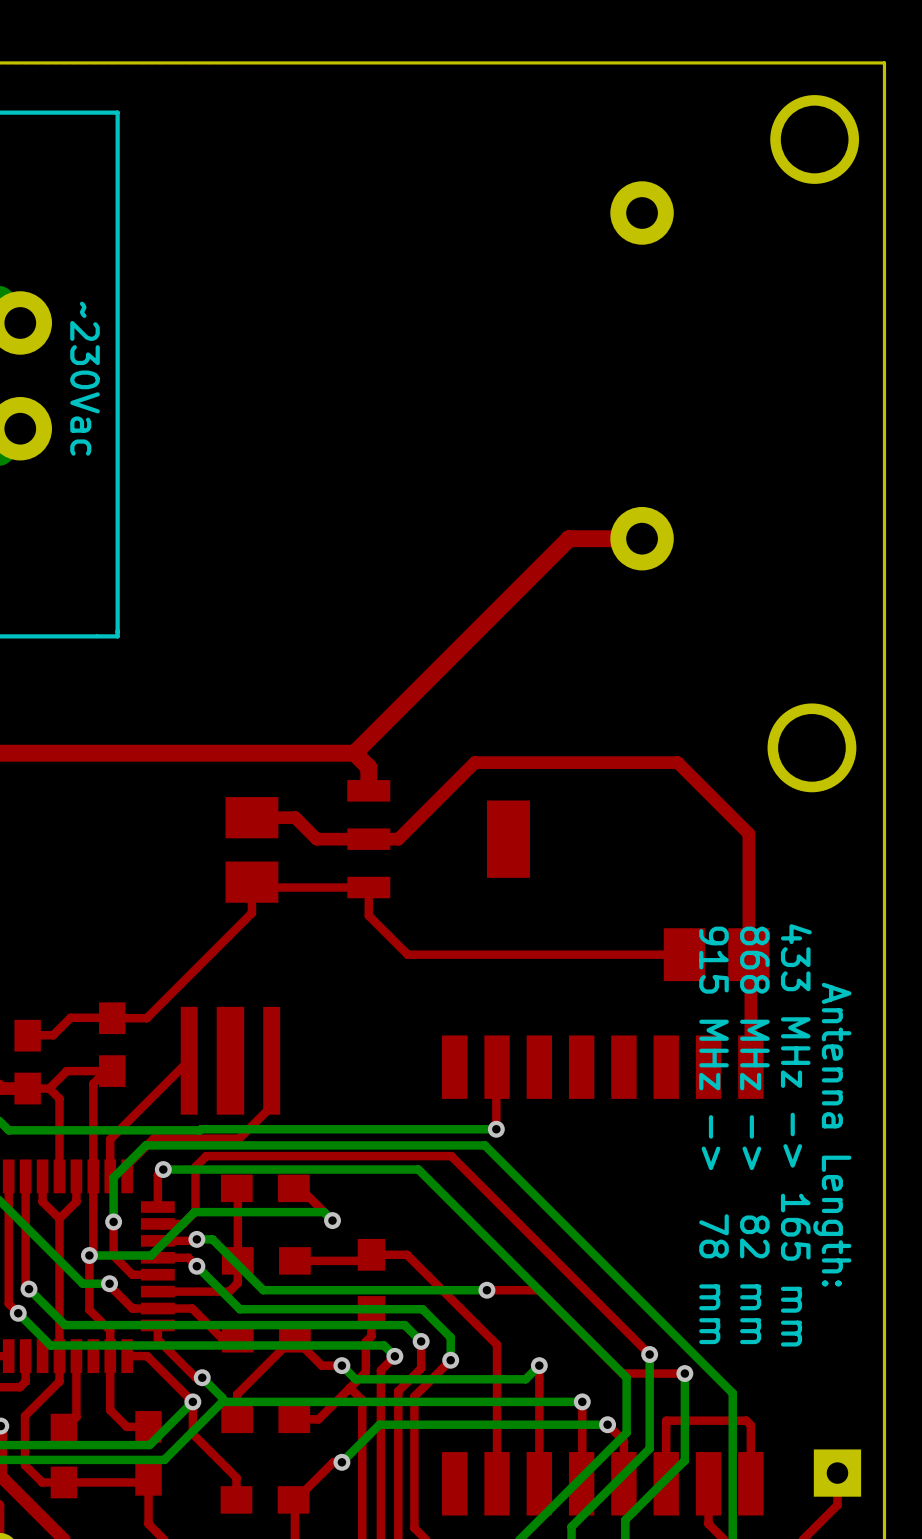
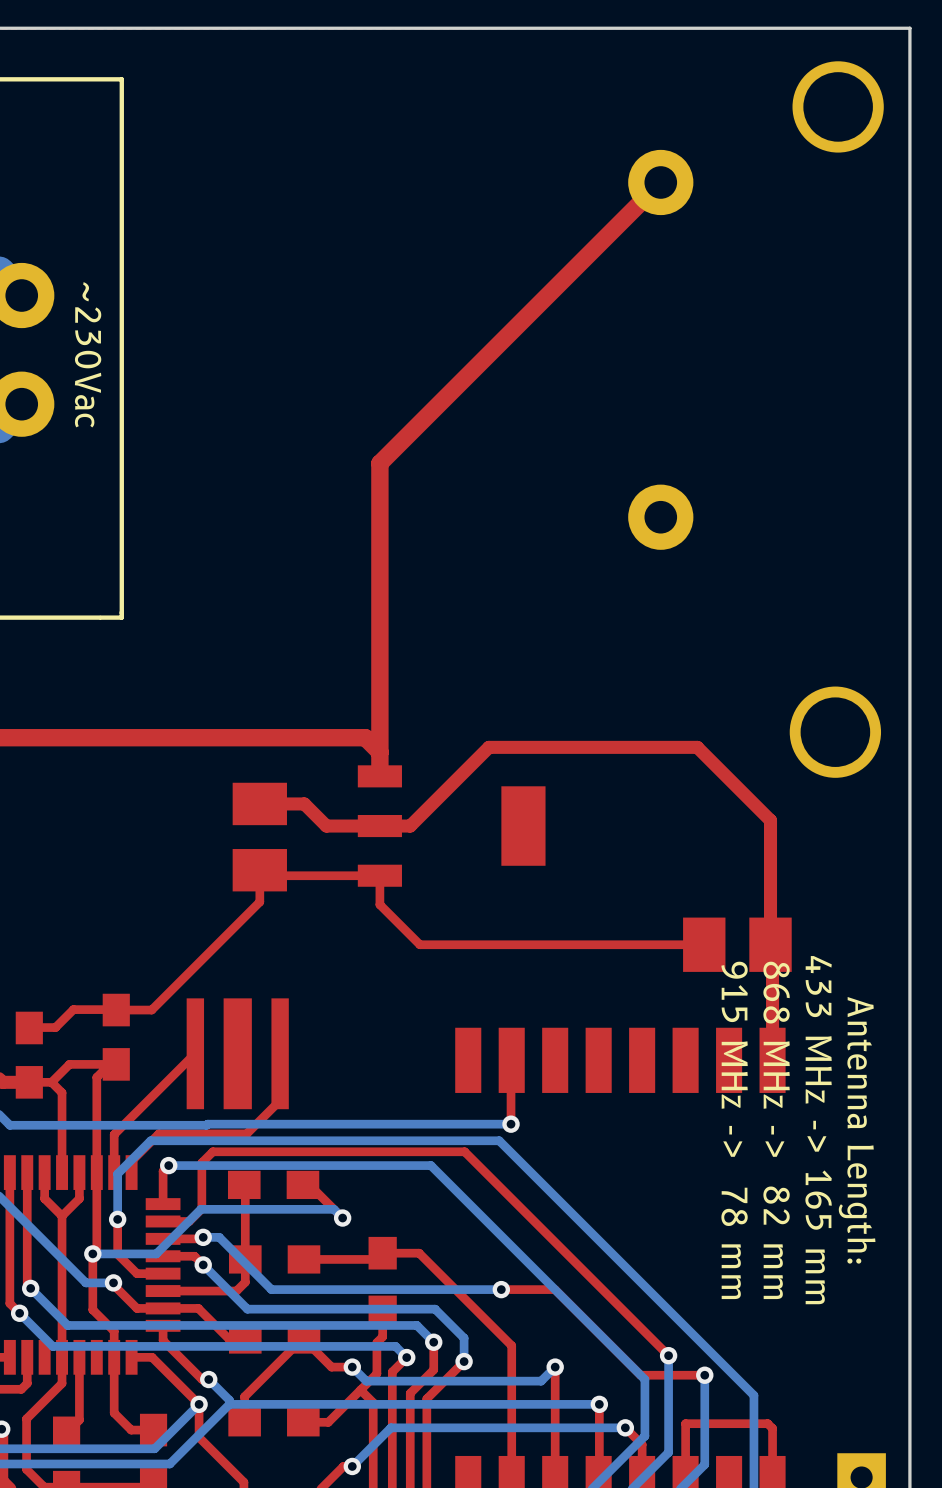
top track: none -> (660, 182) (379, 463) (379, 752)
top track: (642, 538) (569, 538) (354, 753) -> none

